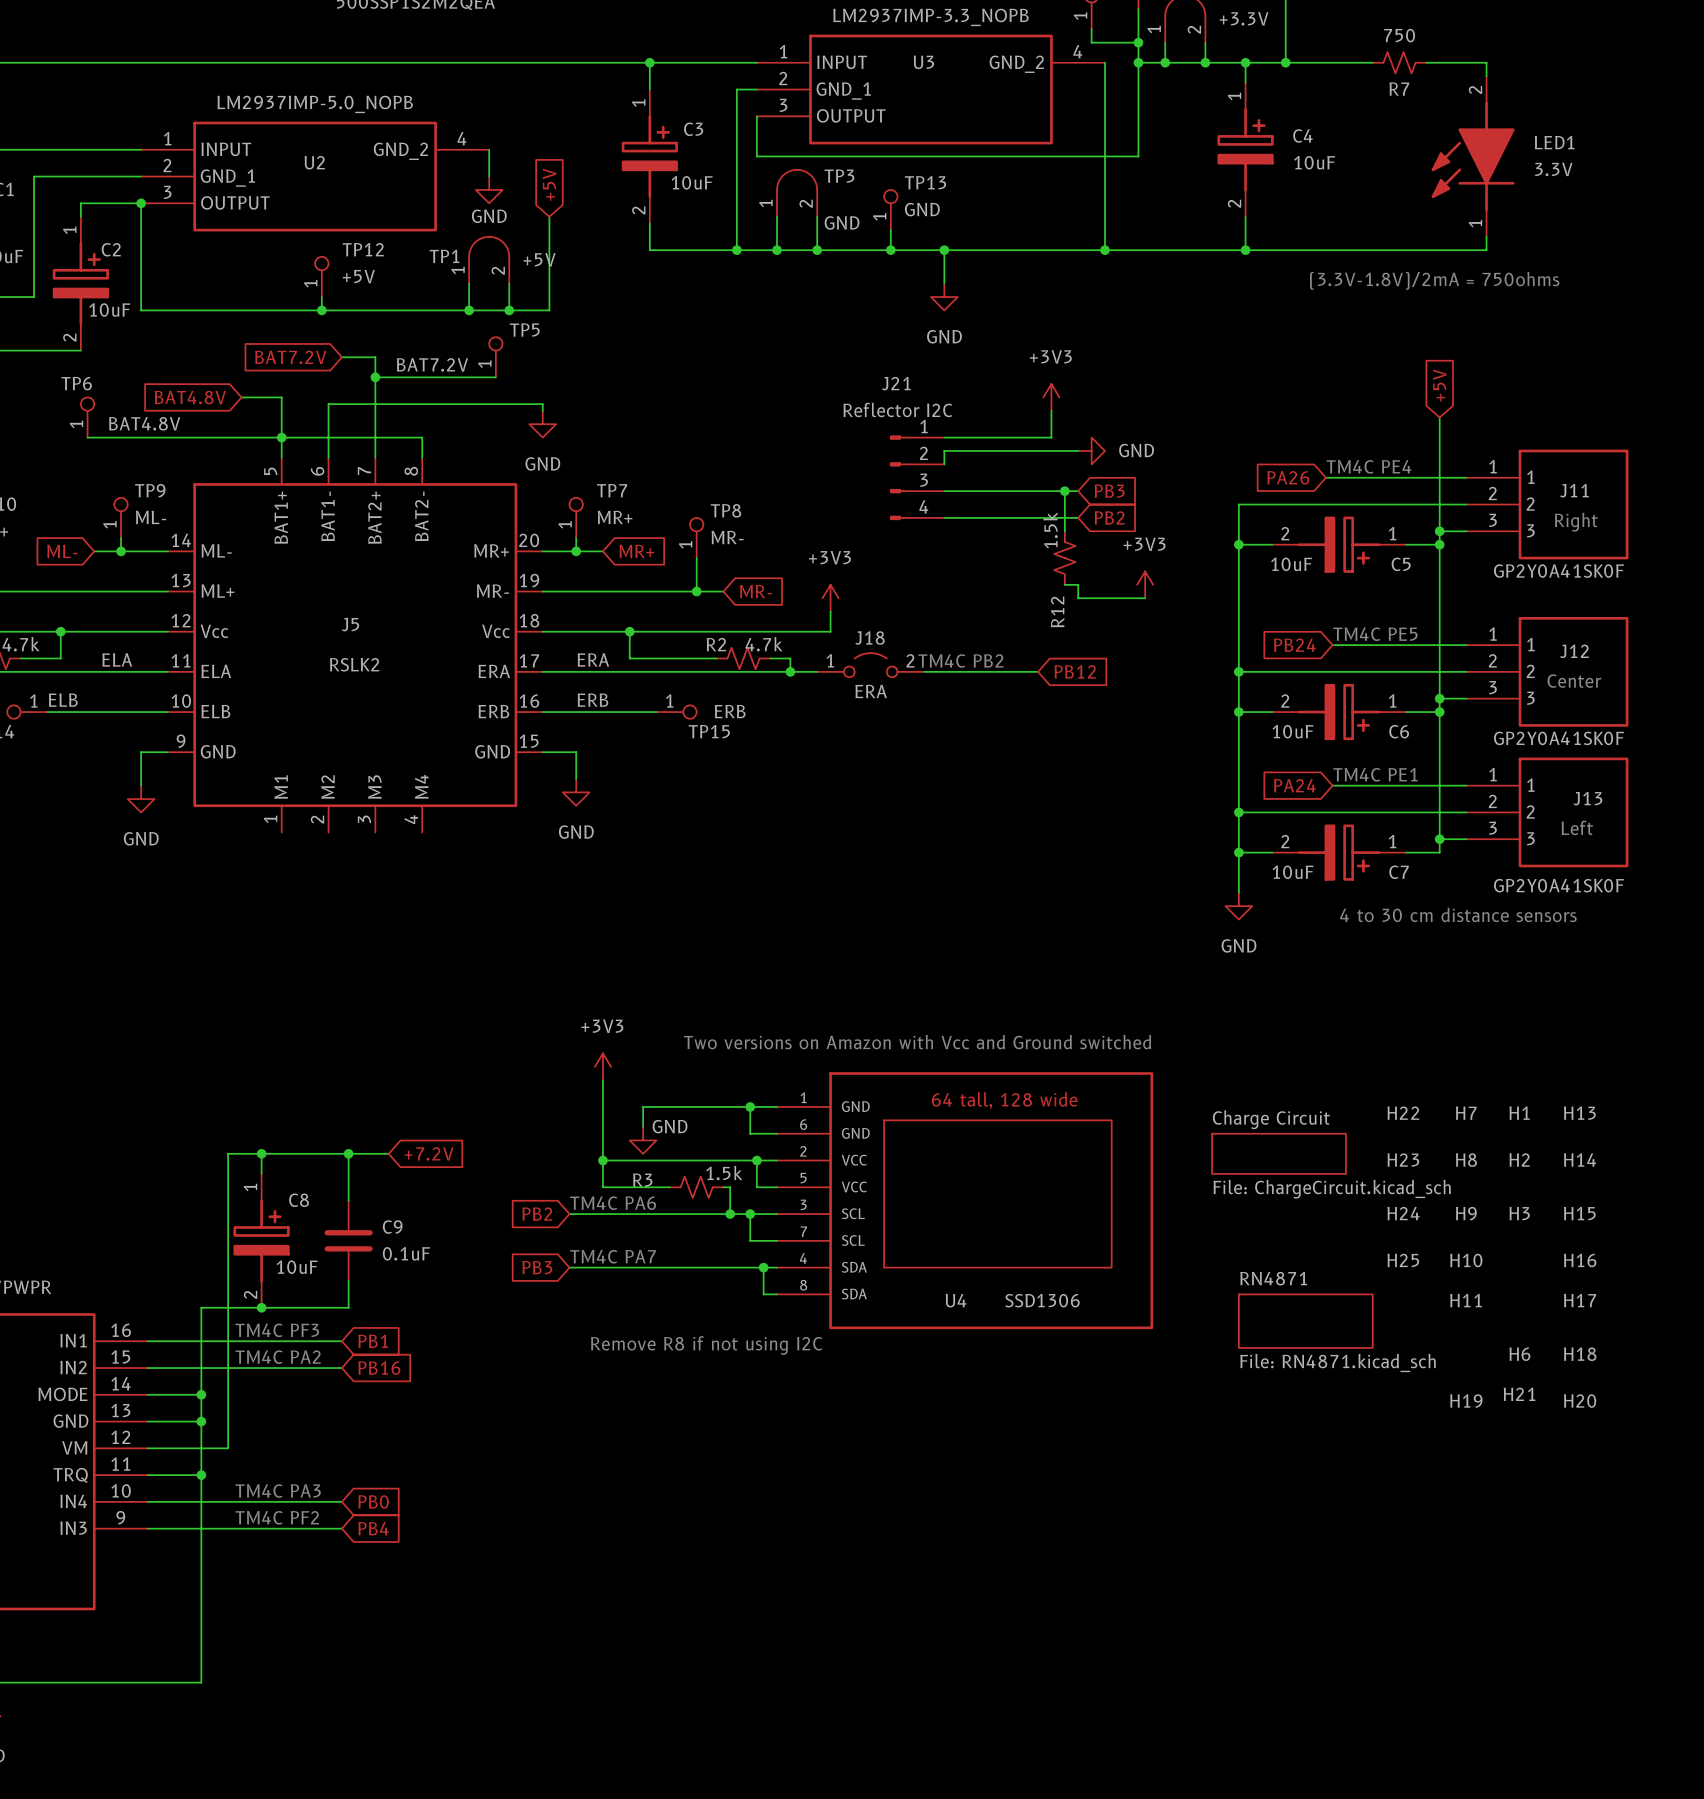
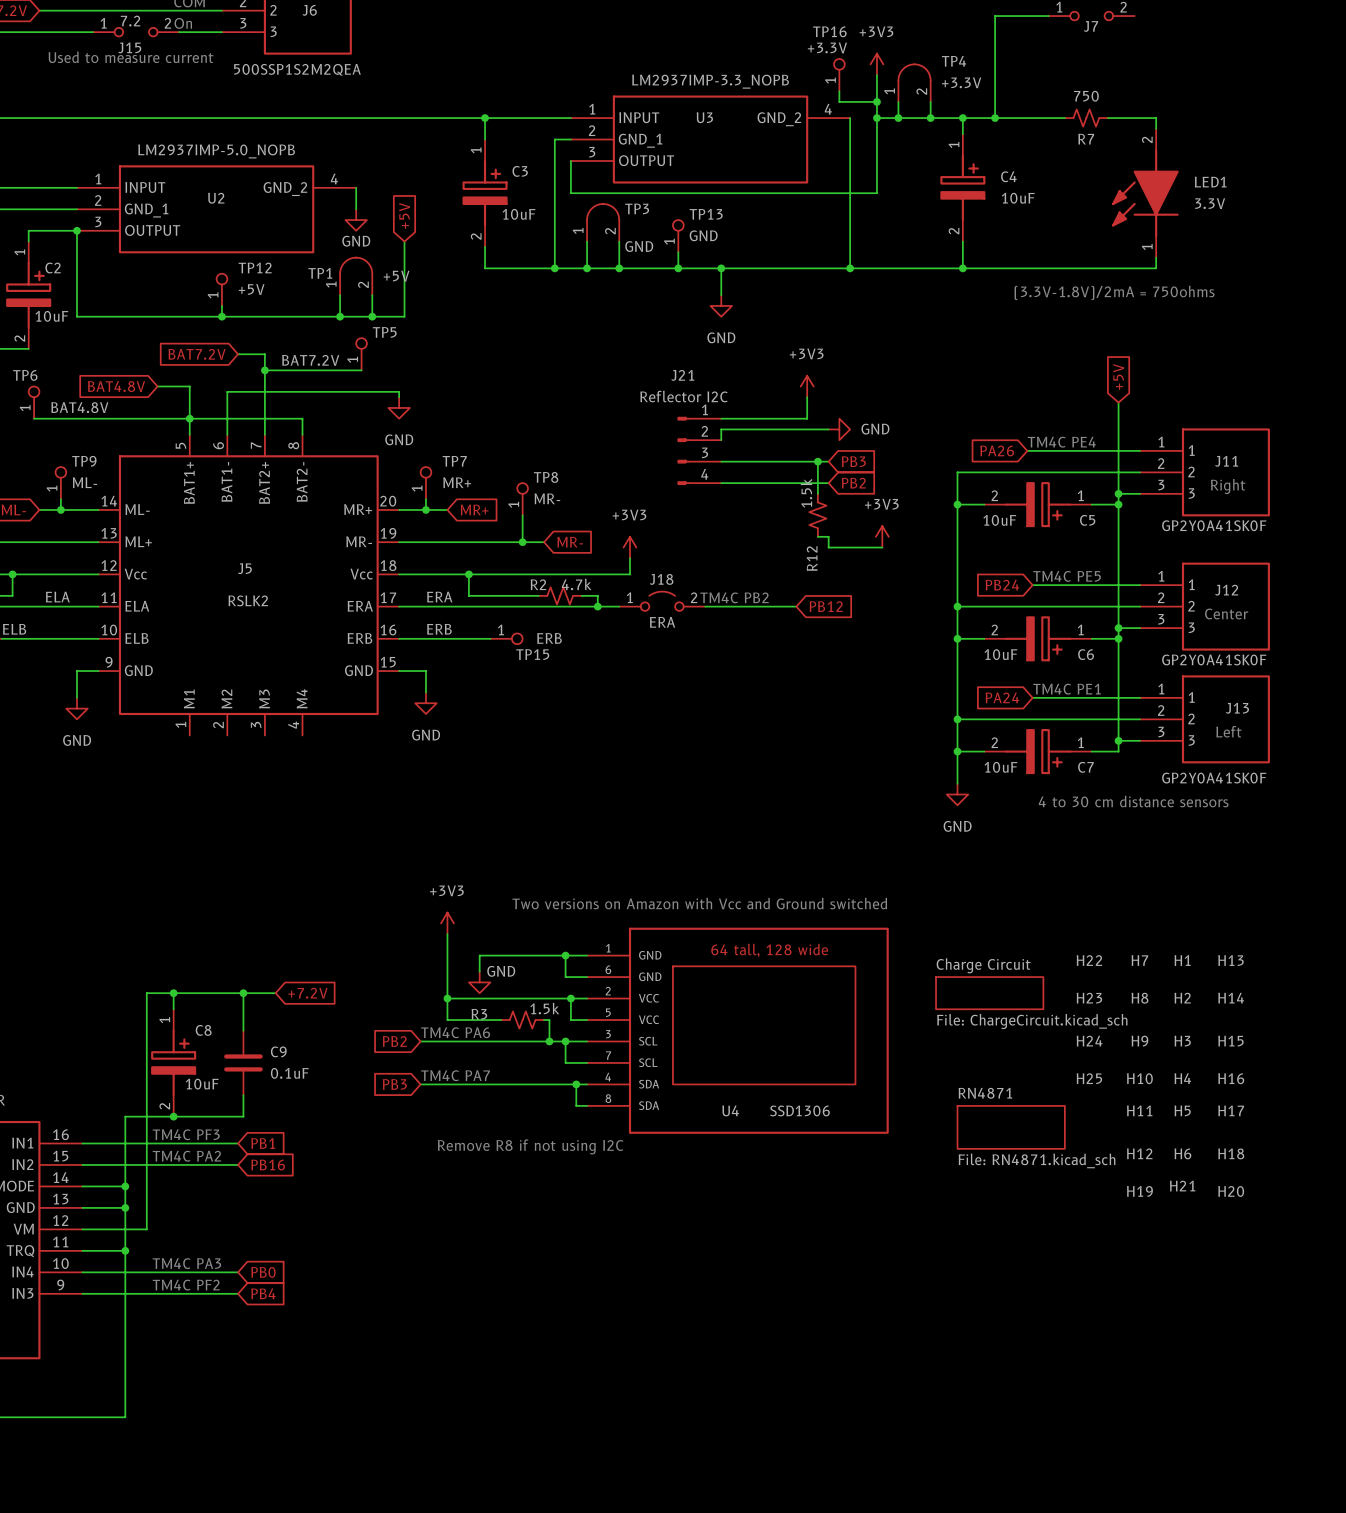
H4: none -> (1182, 1078)
H5: none -> (1182, 1110)
H12: none -> (1139, 1153)

